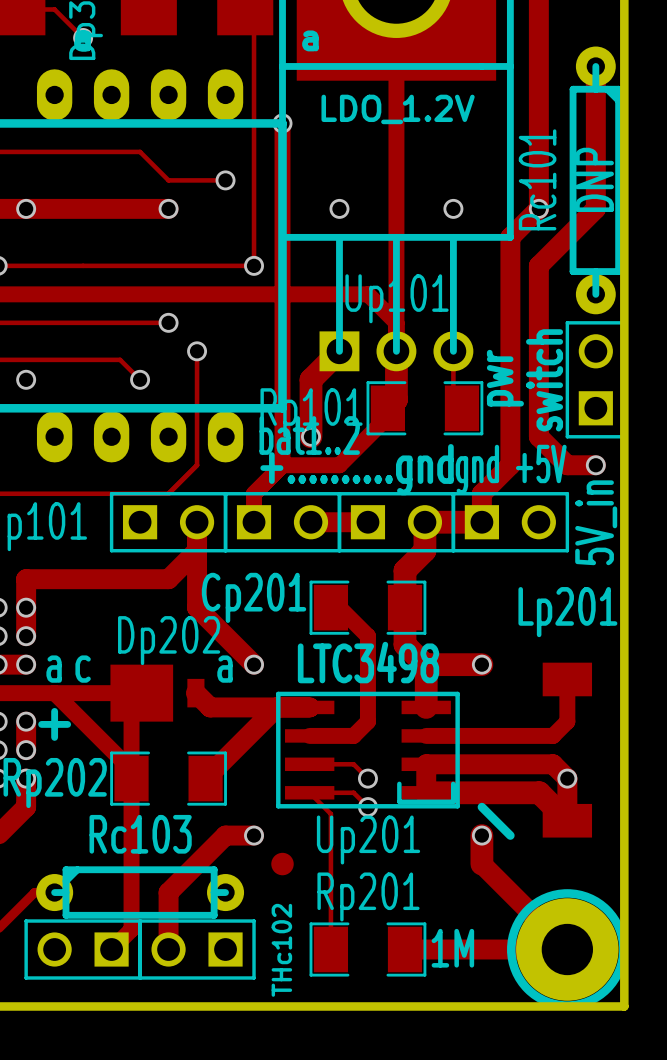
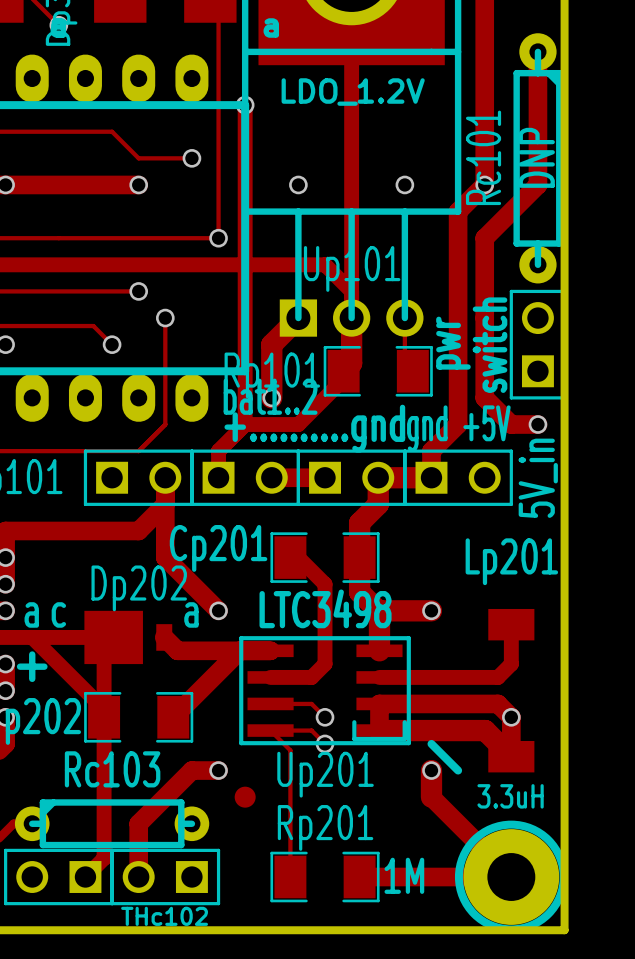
Lp201 value: none -> 3.3uH (510, 796)
THc102 name rotation: 0° (281, 950) -> 90° clockwise (164, 916)

